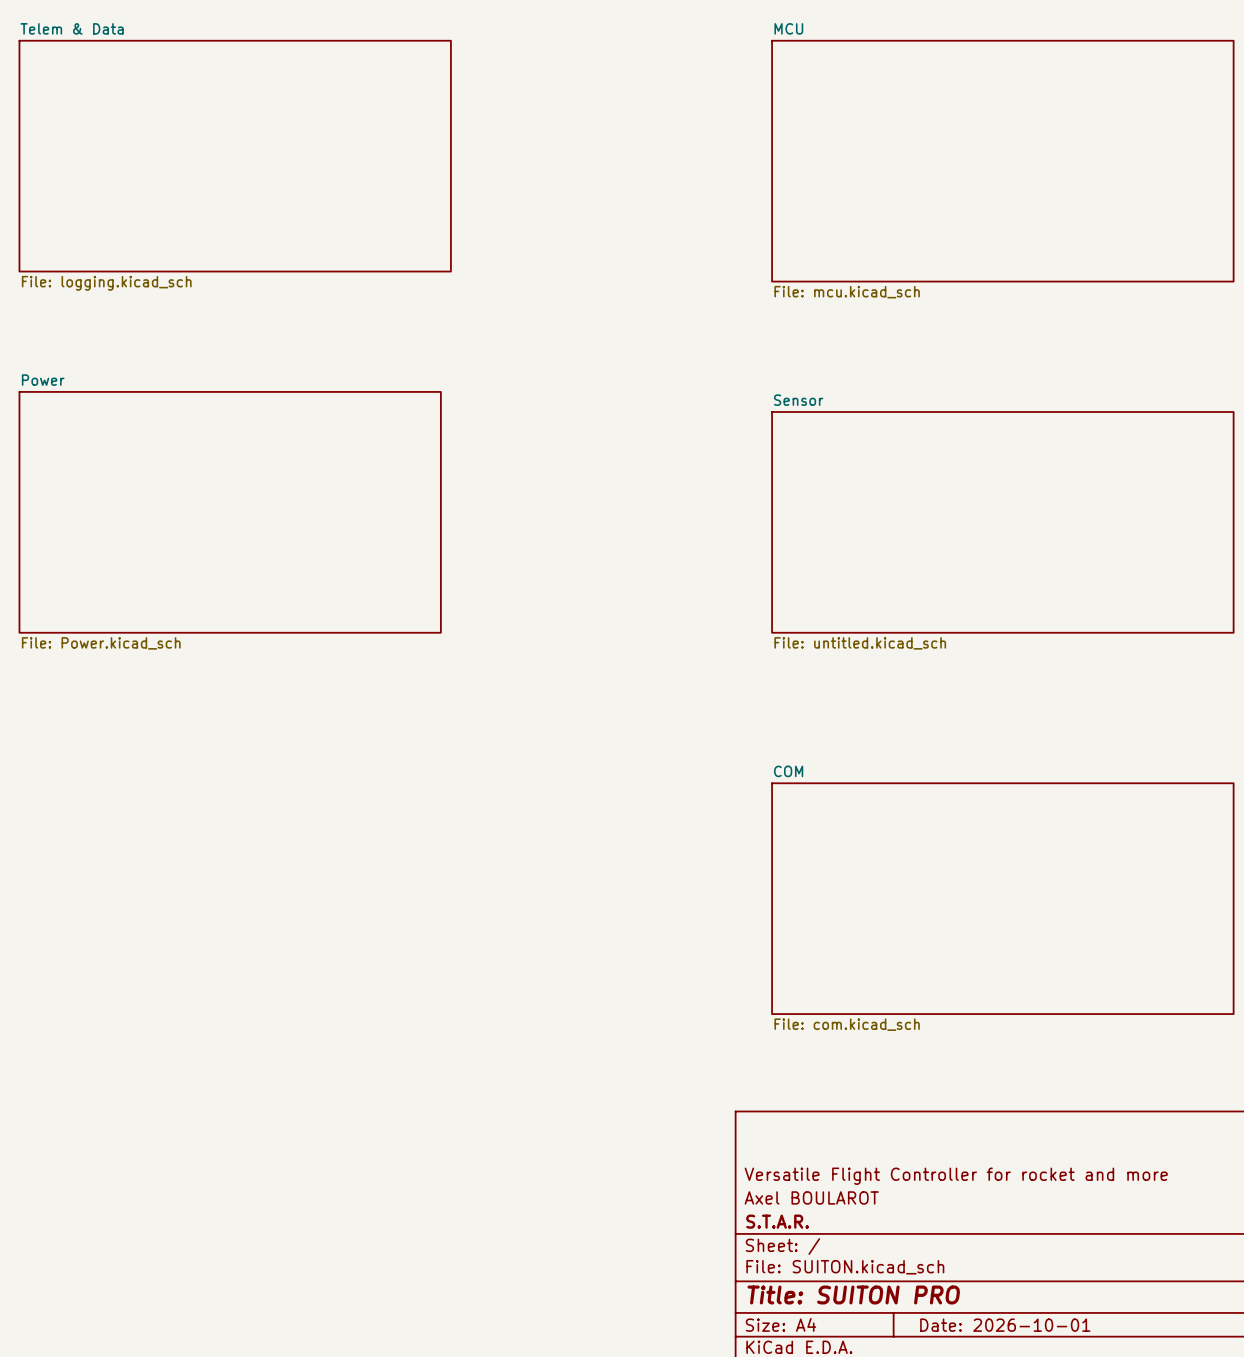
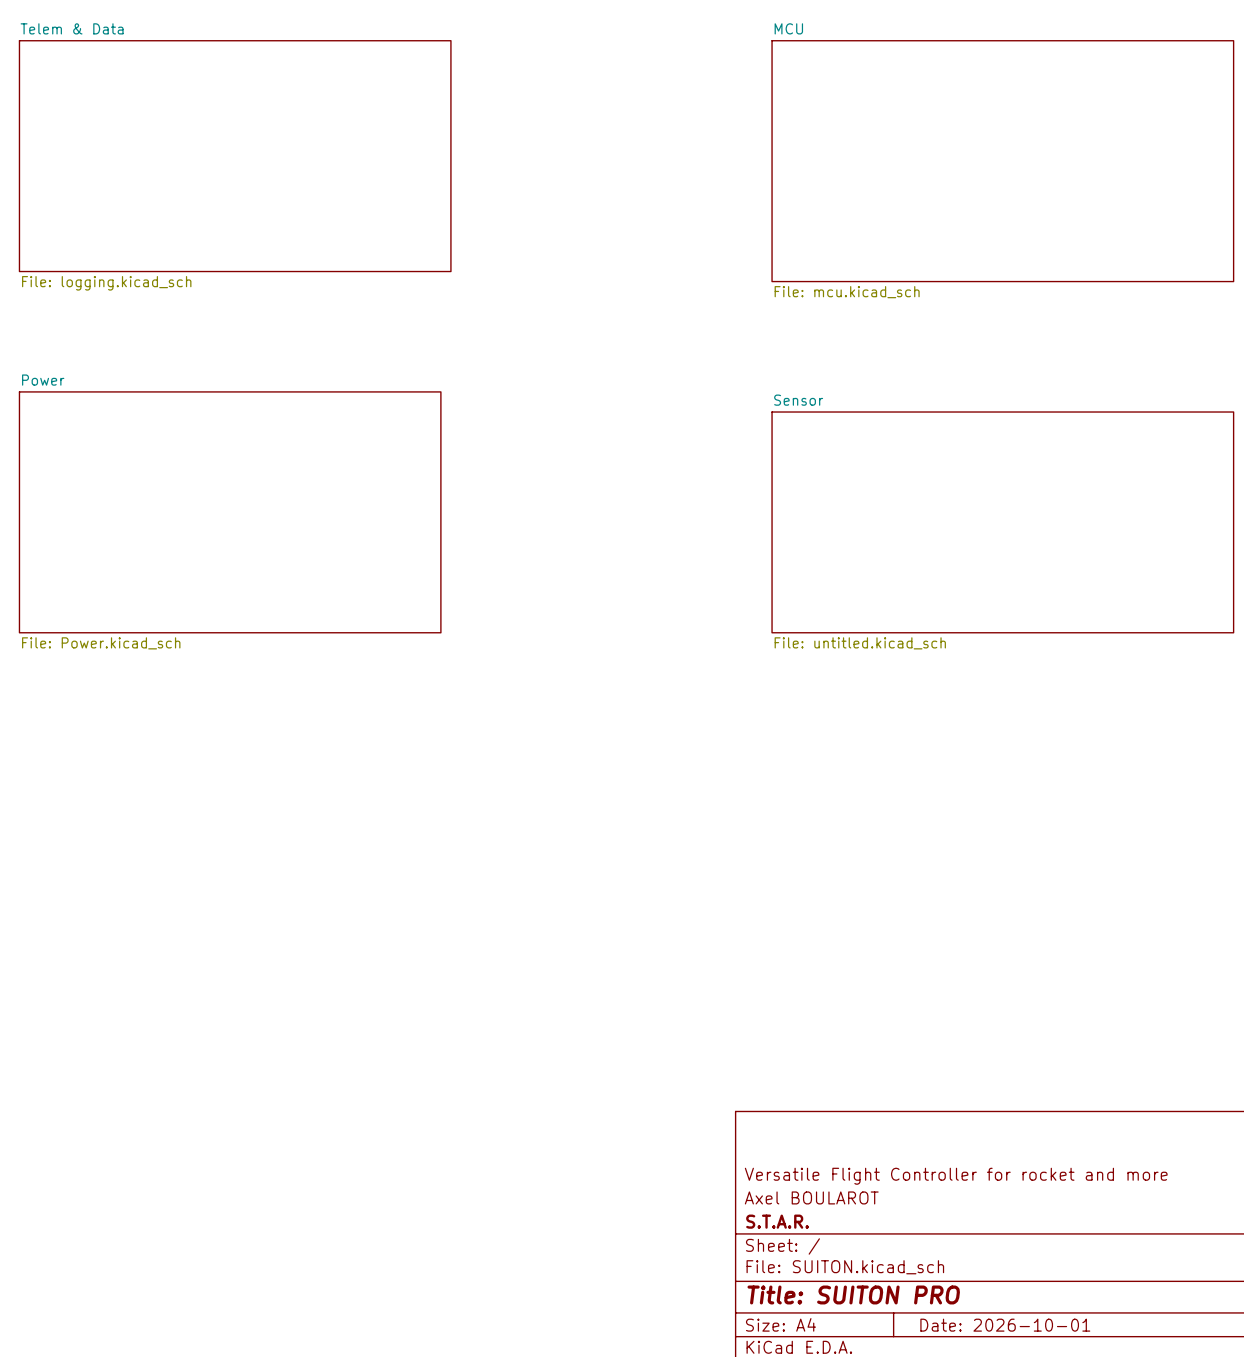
sheet COM: File: com.kicad_sch (1002, 898) -> none

